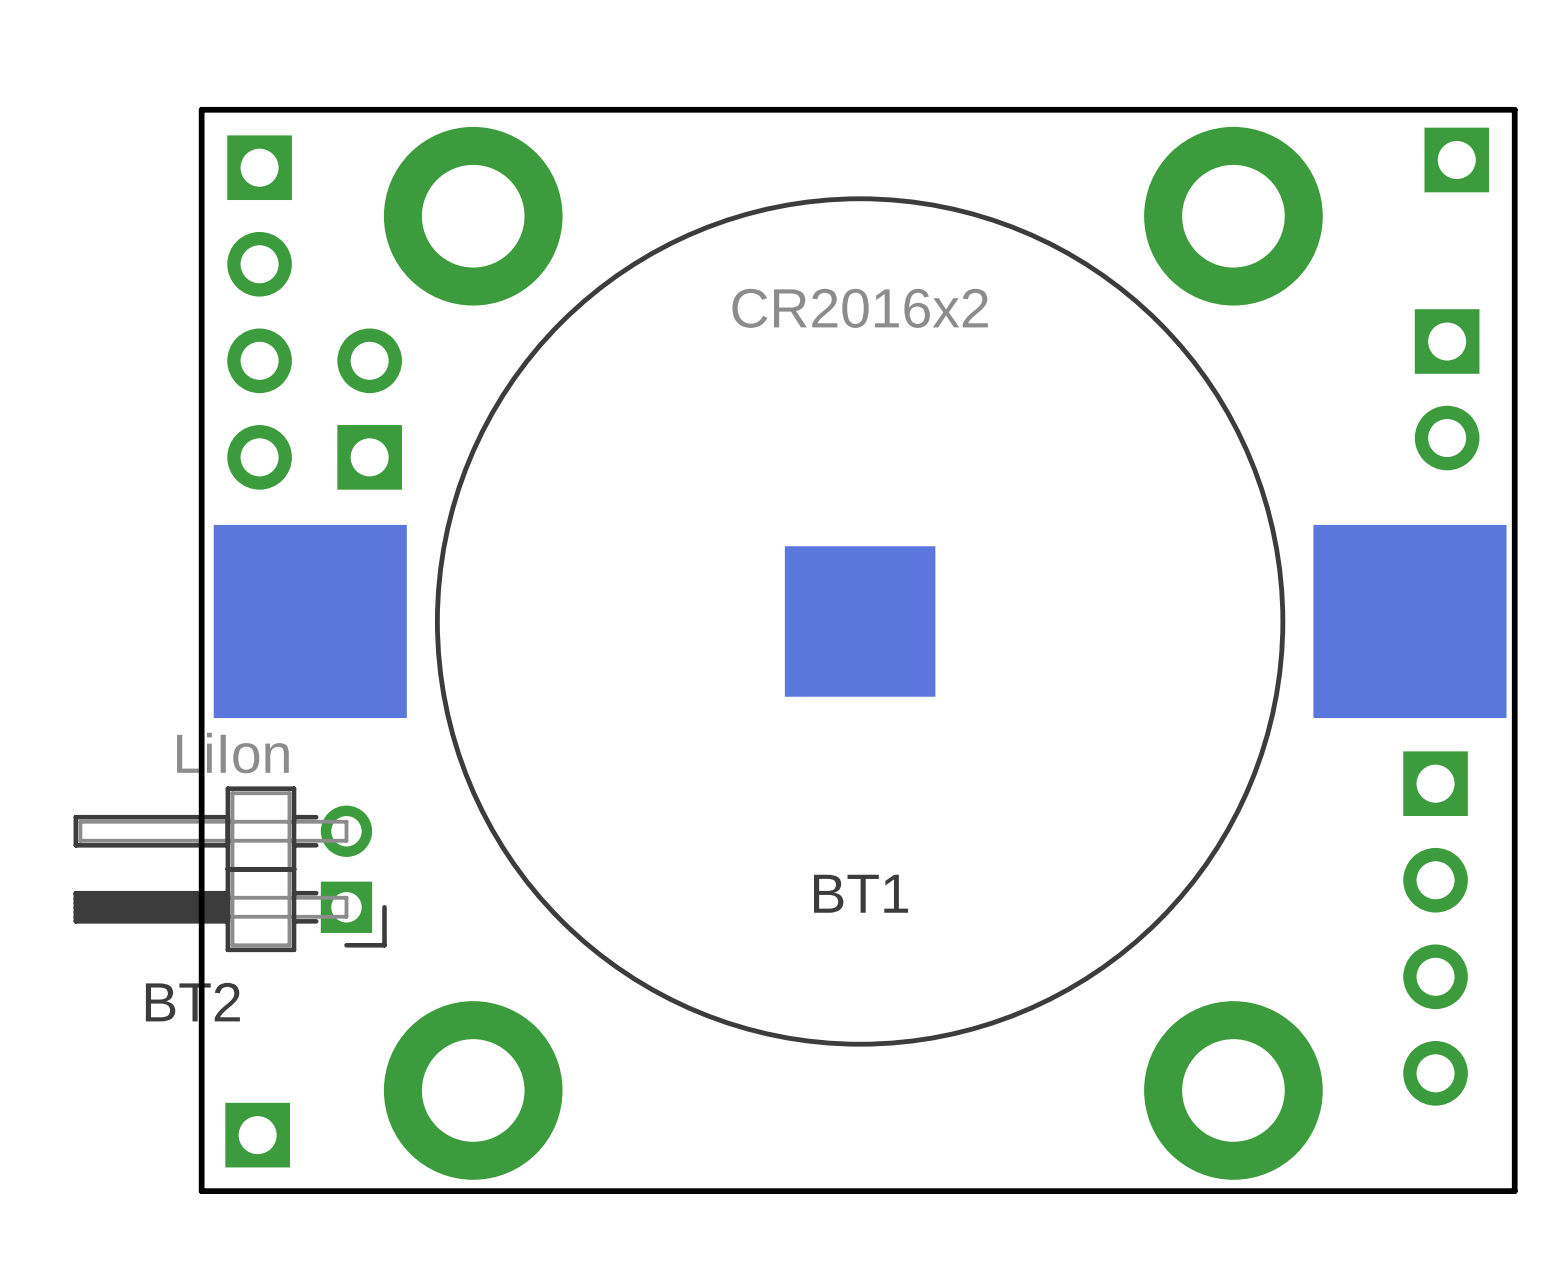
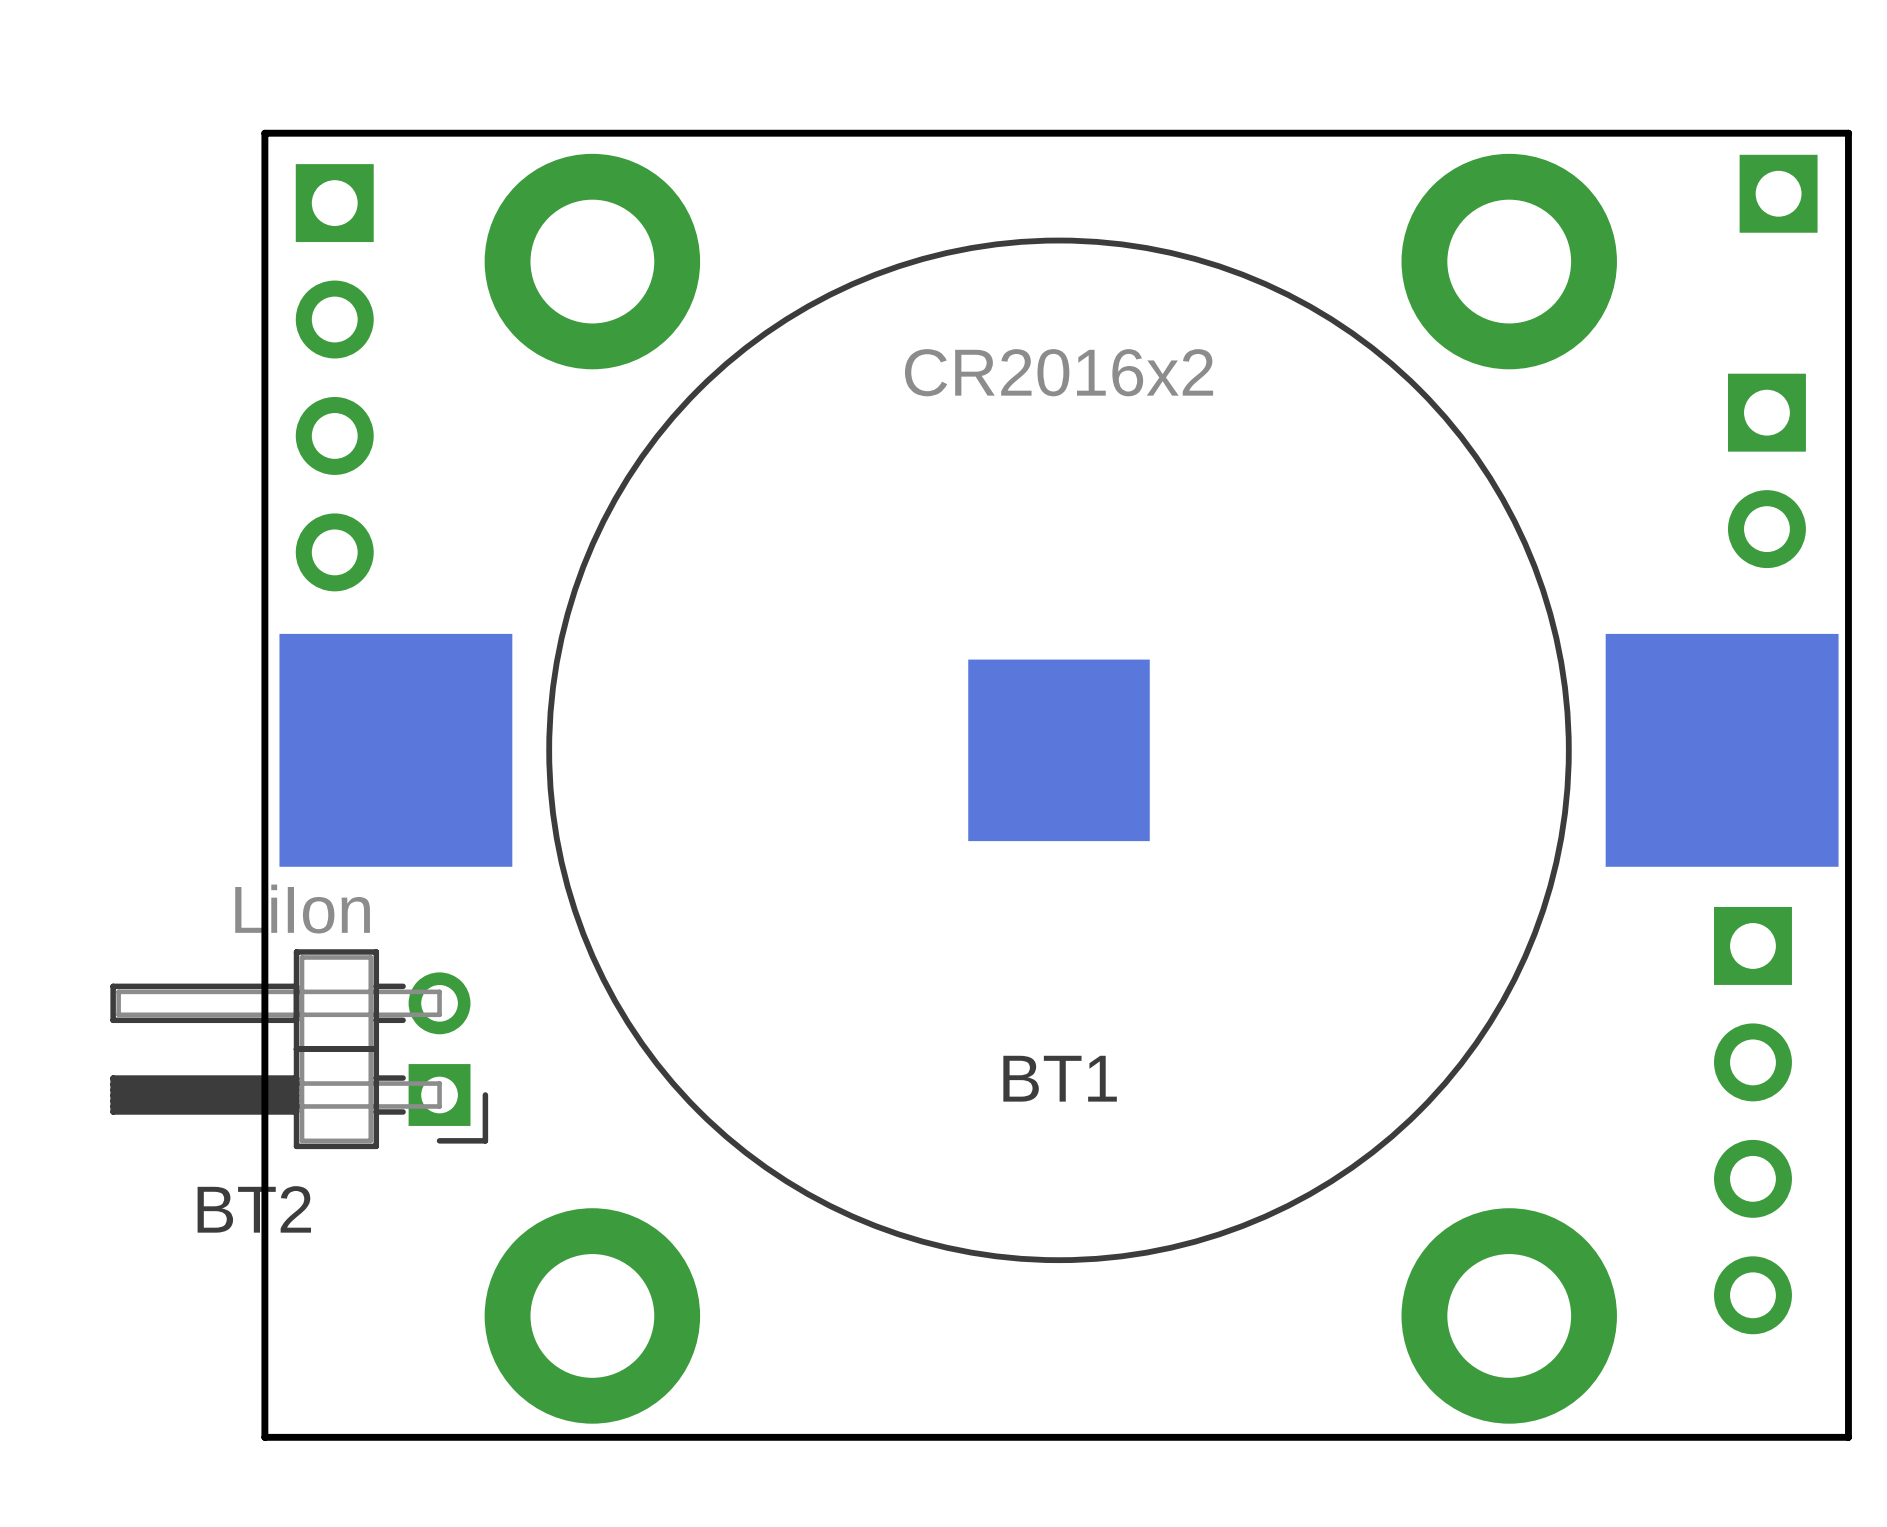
part: (369, 409) -> none
part: (257, 1135) -> none

